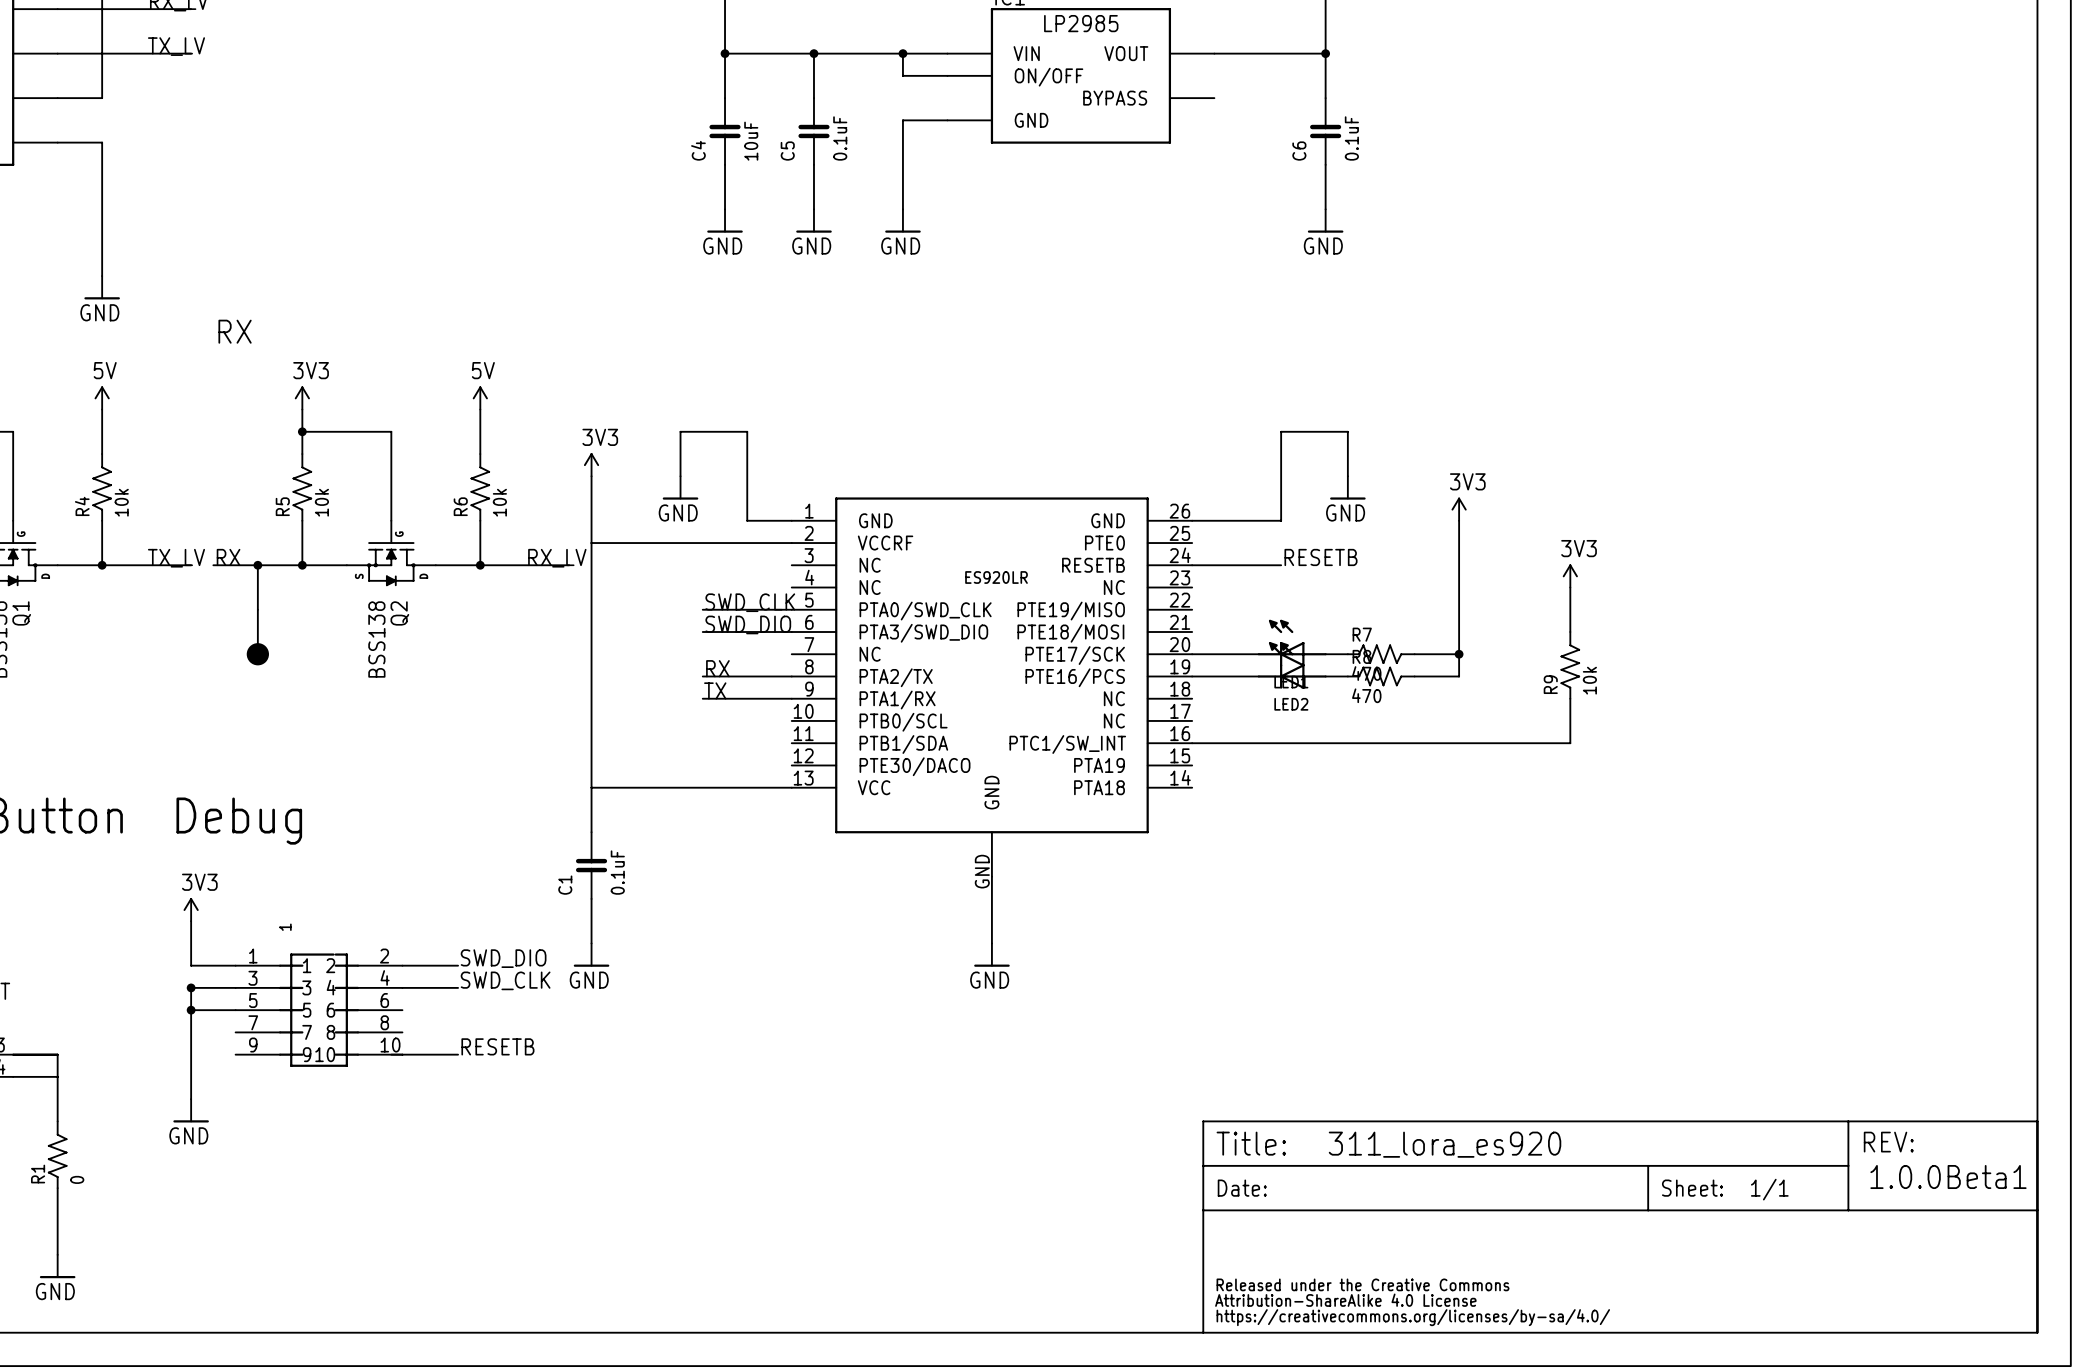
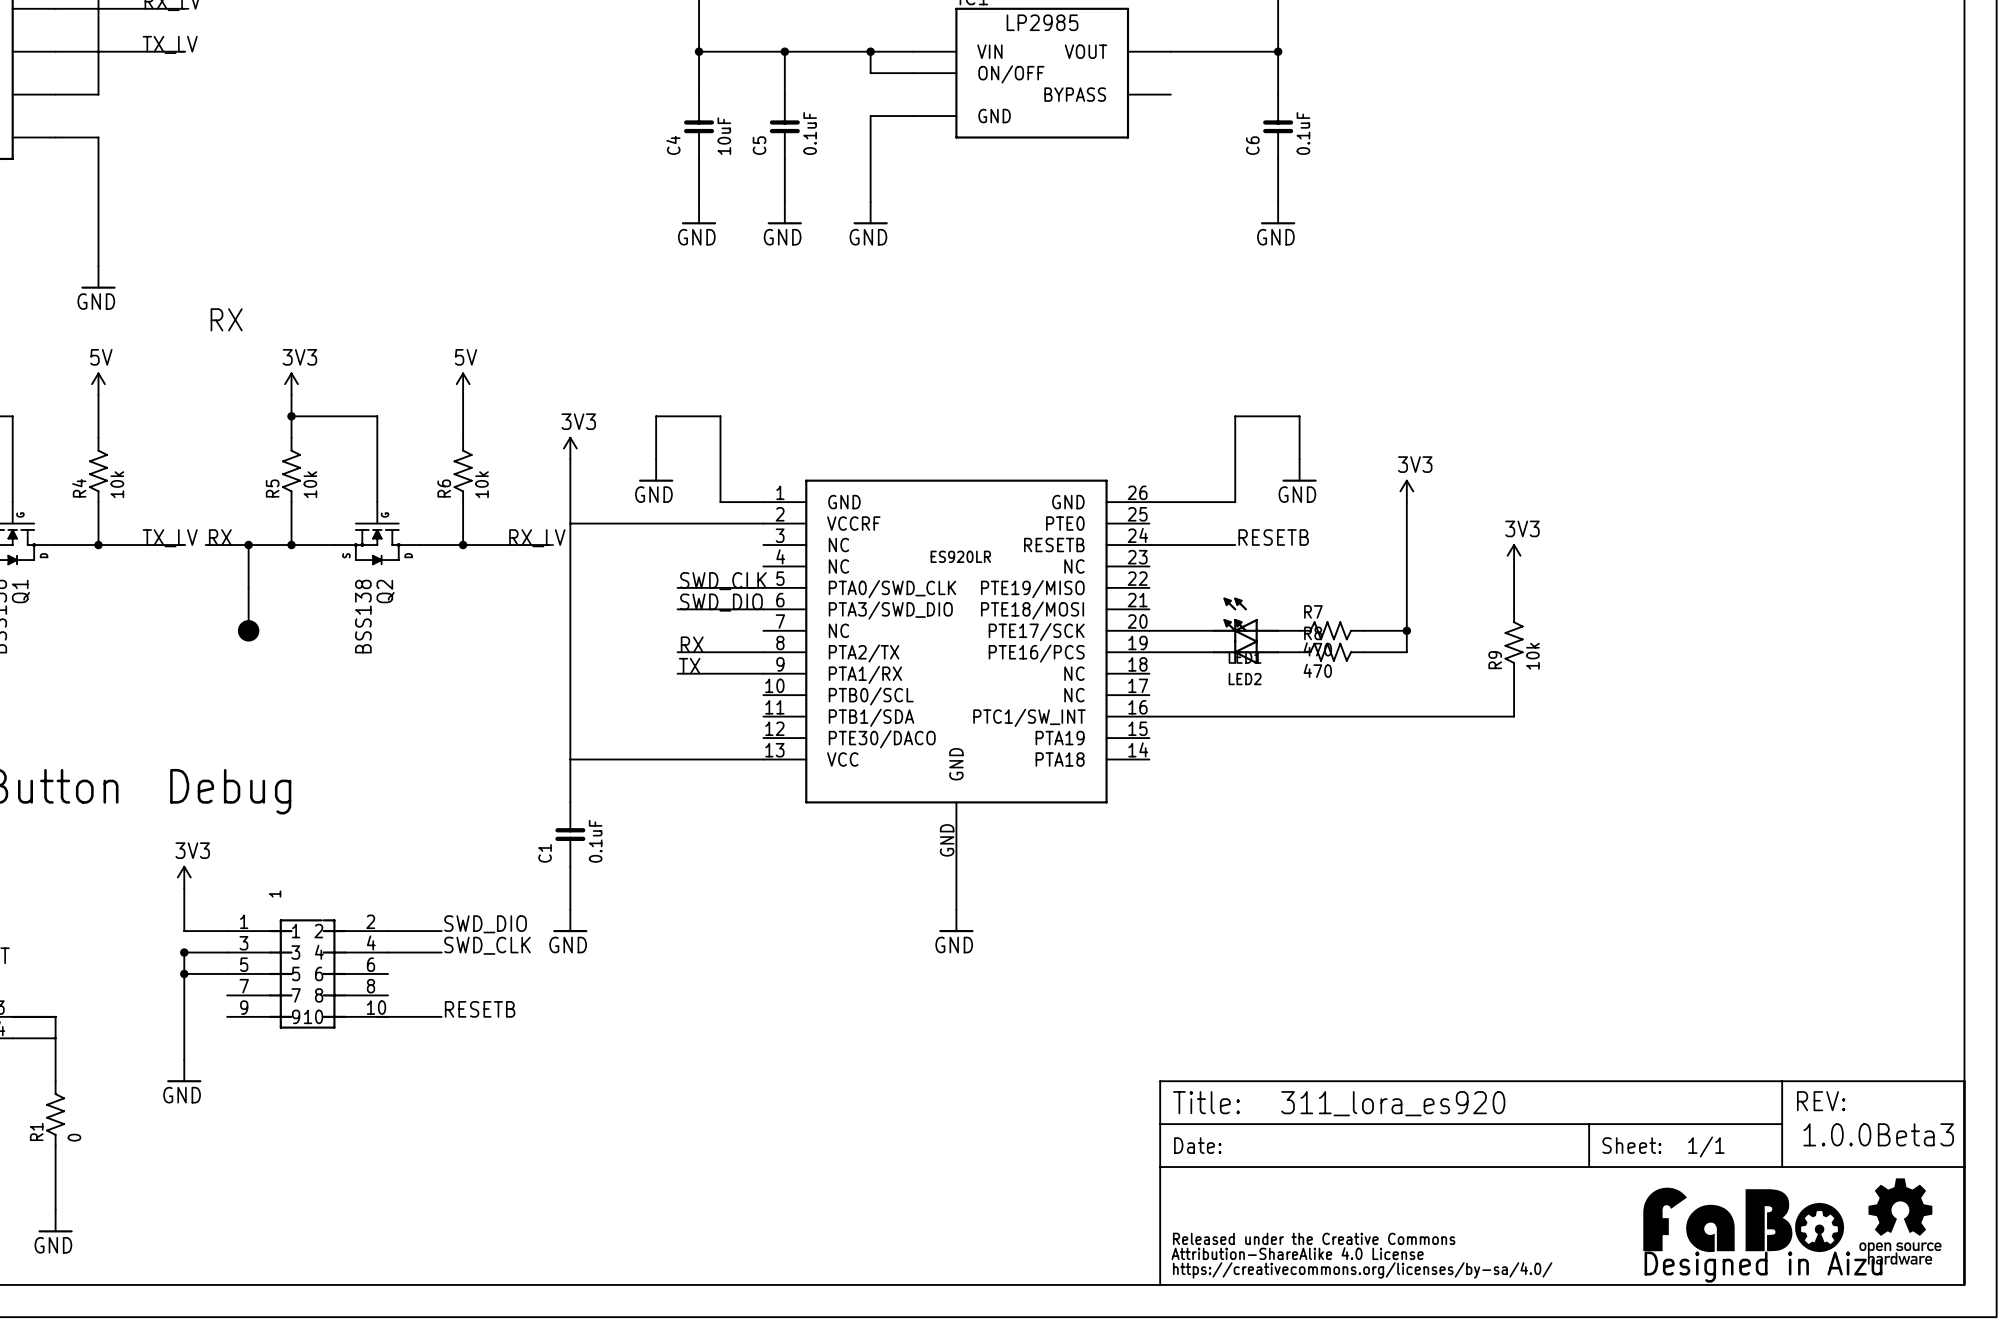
text: 1.0.0Beta1 (1948, 1177) -> 1.0.0Beta3 (1878, 1134)
part: none -> (1743, 1219)
part: none -> (1900, 1221)

